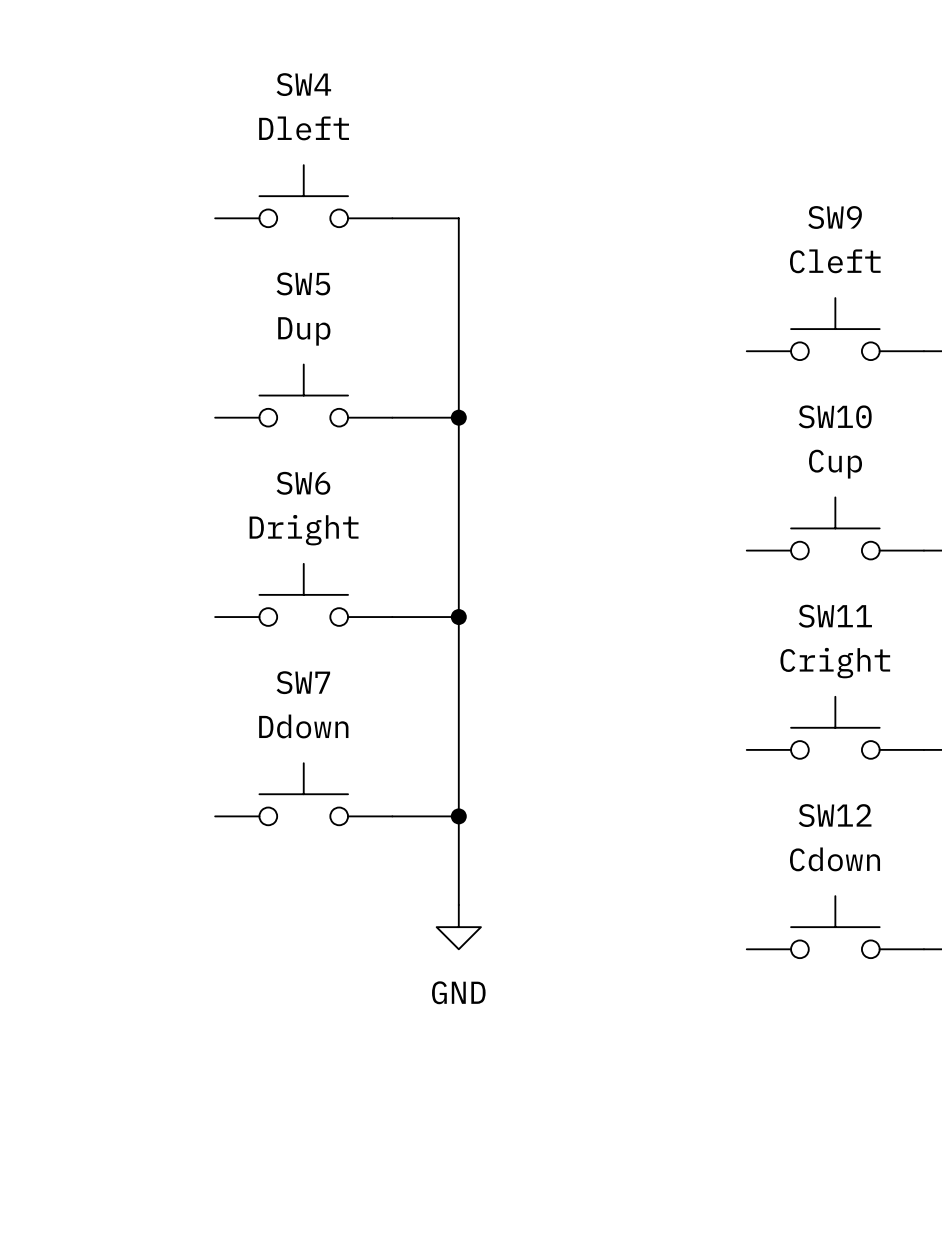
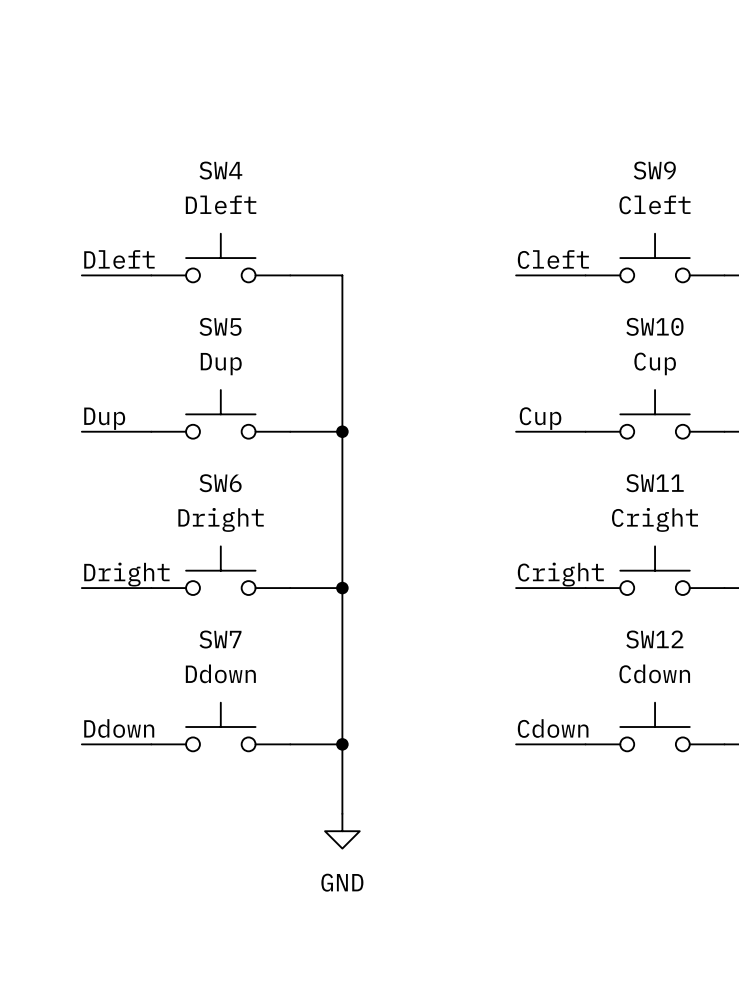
SW4 position: (303, 196) -> (220, 258)
wire: (392, 218) (458, 218) (458, 904) -> (290, 275) (342, 275) (342, 813)
label: none -> Dleft (119, 259)
label: none -> Cleft (553, 259)
wire: none -> (81, 275) (151, 275)
wire: none -> (516, 275) (585, 275)
SW5 position: (303, 395) -> (220, 414)
wire: (392, 417) (458, 417) -> (290, 431) (342, 431)
junction: (458, 417) -> none
label: none -> Dup (104, 418)
label: none -> Cup (540, 418)
wire: none -> (81, 431) (151, 431)
junction: none -> (342, 431)
wire: none -> (516, 431) (585, 431)
SW6 position: (303, 594) -> (220, 570)
wire: (392, 617) (458, 617) -> (290, 588) (342, 588)
junction: (458, 617) -> none
label: none -> Dright (126, 574)
label: none -> Cright (560, 574)
wire: none -> (81, 588) (151, 588)
junction: none -> (342, 588)
wire: none -> (516, 588) (585, 588)
SW7 position: (303, 794) -> (220, 727)
wire: (392, 816) (458, 816) -> (290, 744) (342, 744)
junction: (458, 816) -> none
power symbol position: GND (458, 927) -> GND (342, 831)
label: none -> Ddown (119, 728)
label: none -> Cdown (553, 728)
wire: none -> (81, 744) (151, 744)
junction: none -> (342, 744)
wire: none -> (516, 744) (585, 744)

